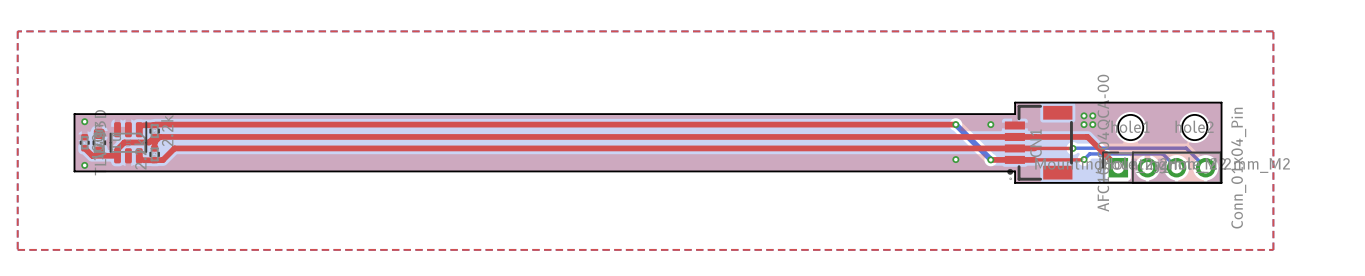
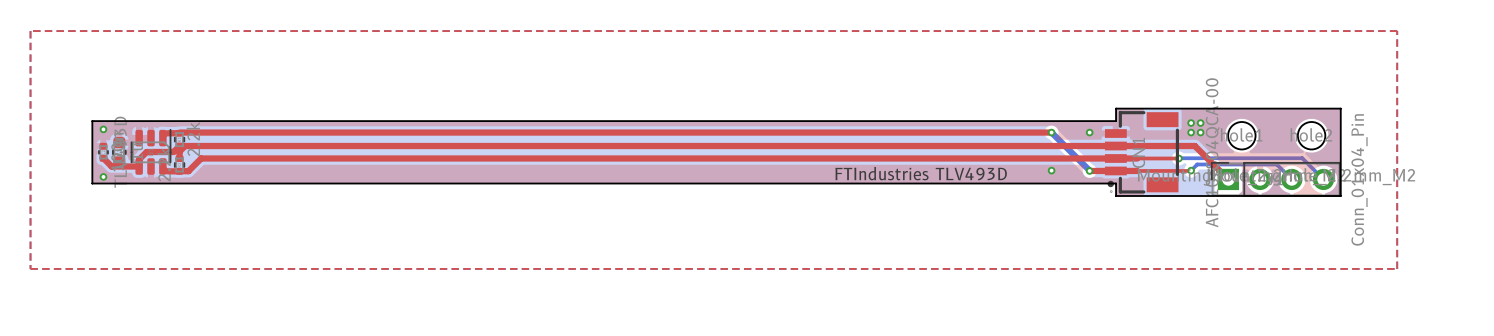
text: none -> FTIndustries TLV493D (921, 173)

